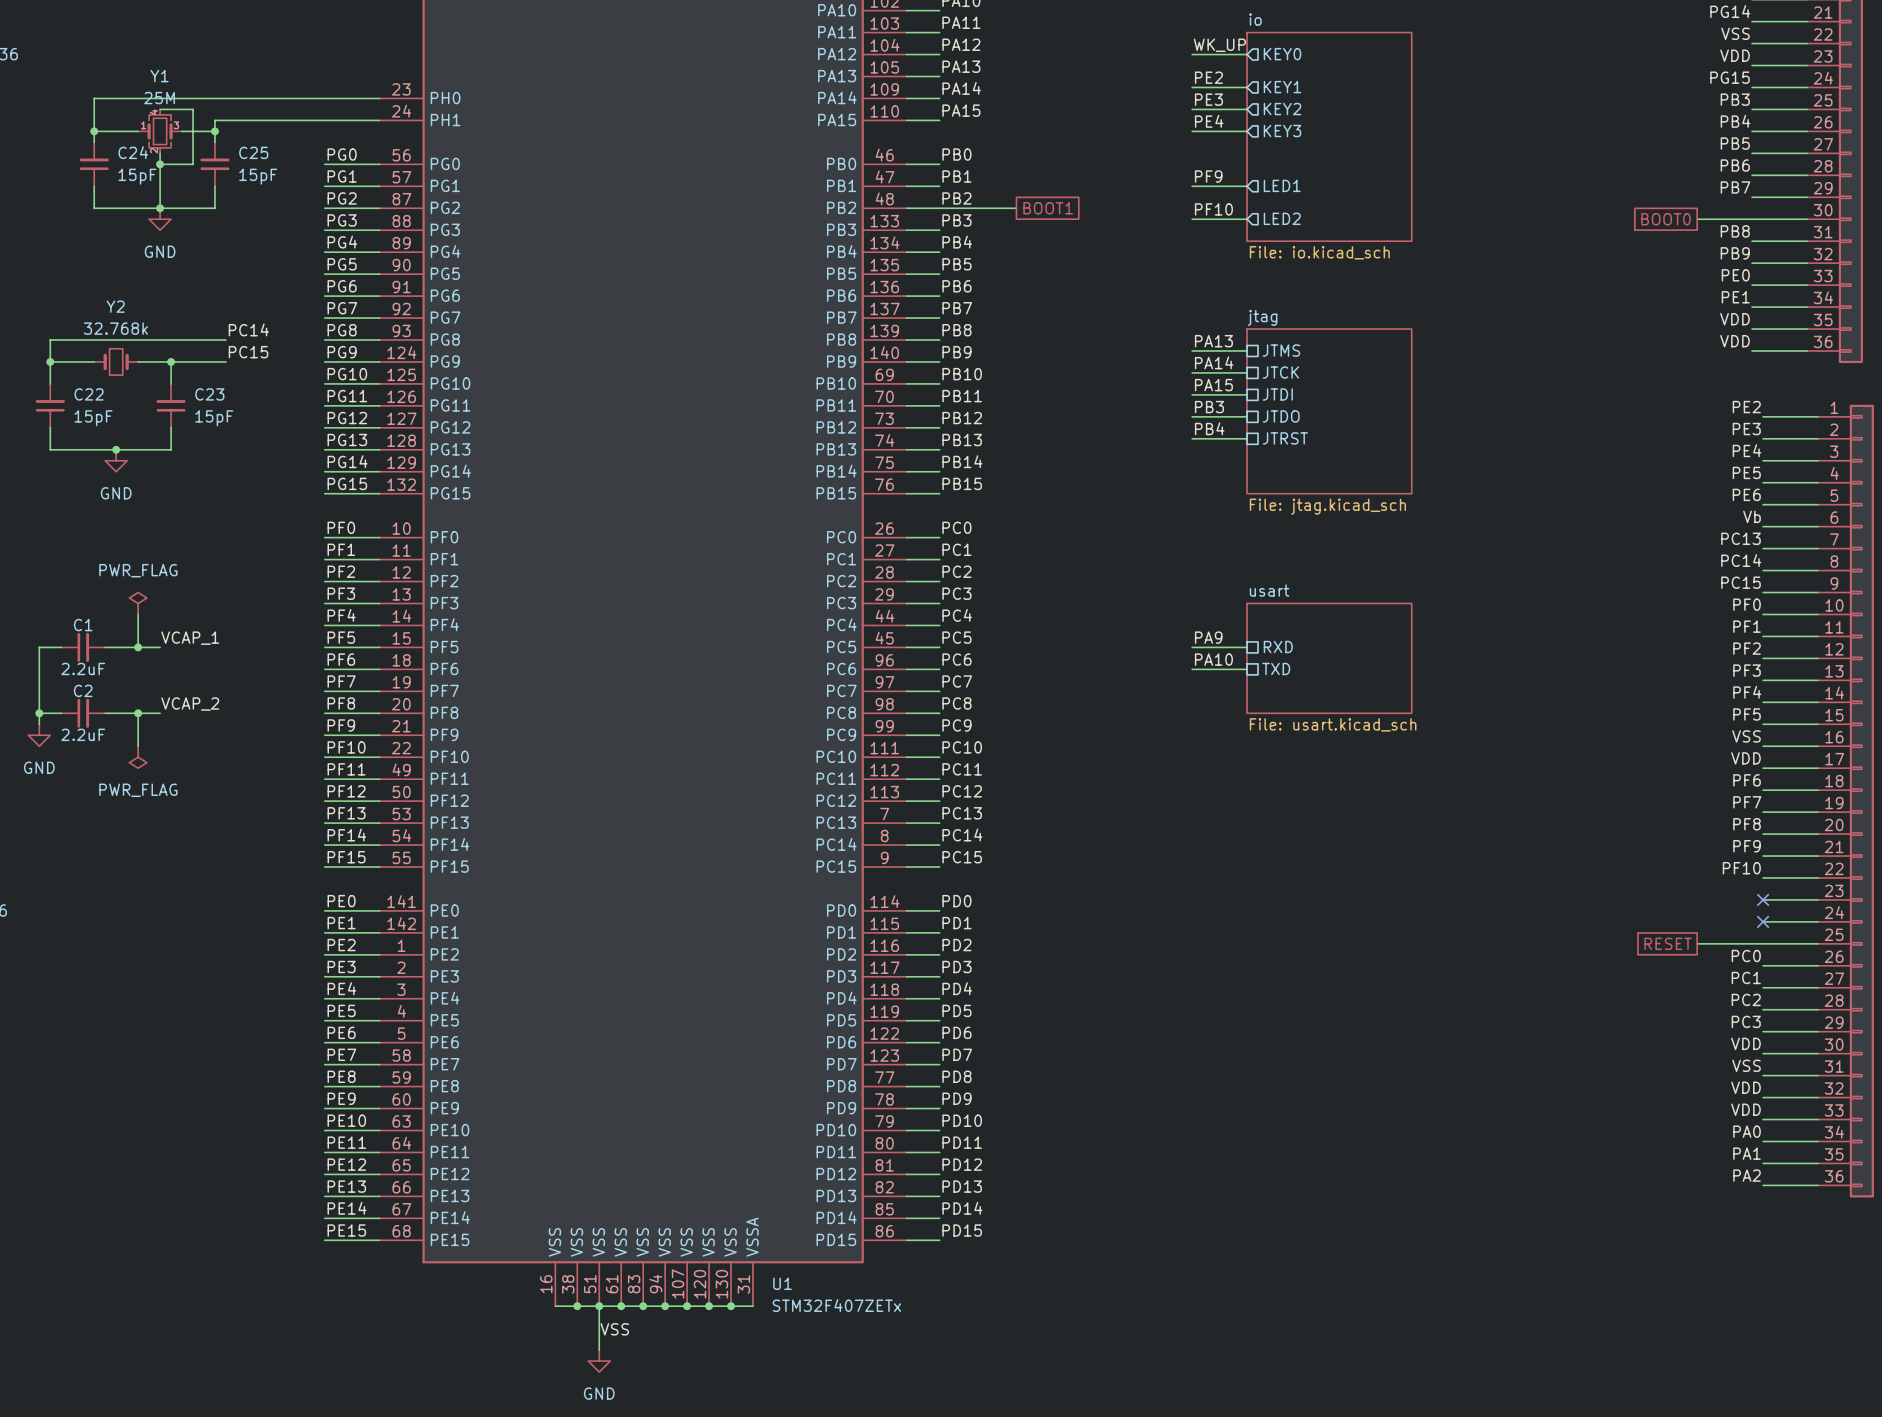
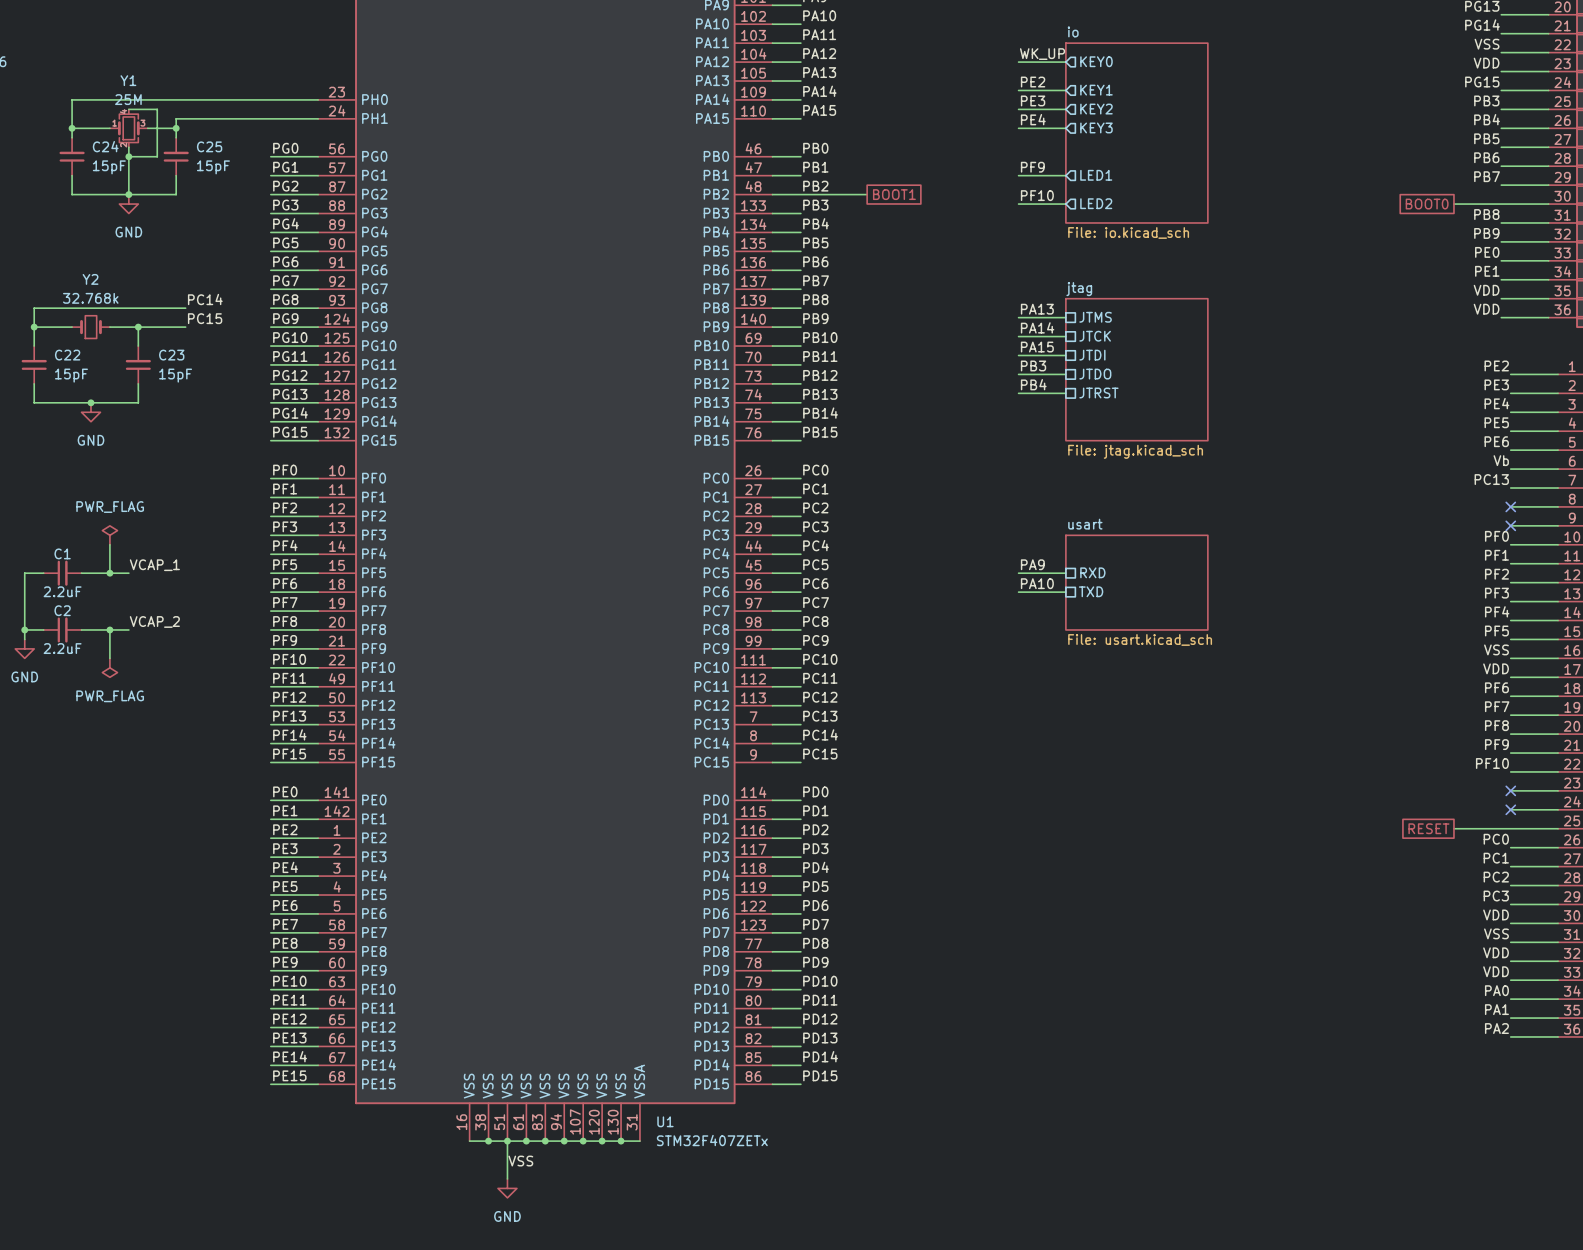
label: PC14 (1741, 560) -> none
no-connect mark: none -> (1510, 506)
label: PC15 (1741, 582) -> none
no-connect mark: none -> (1510, 525)

